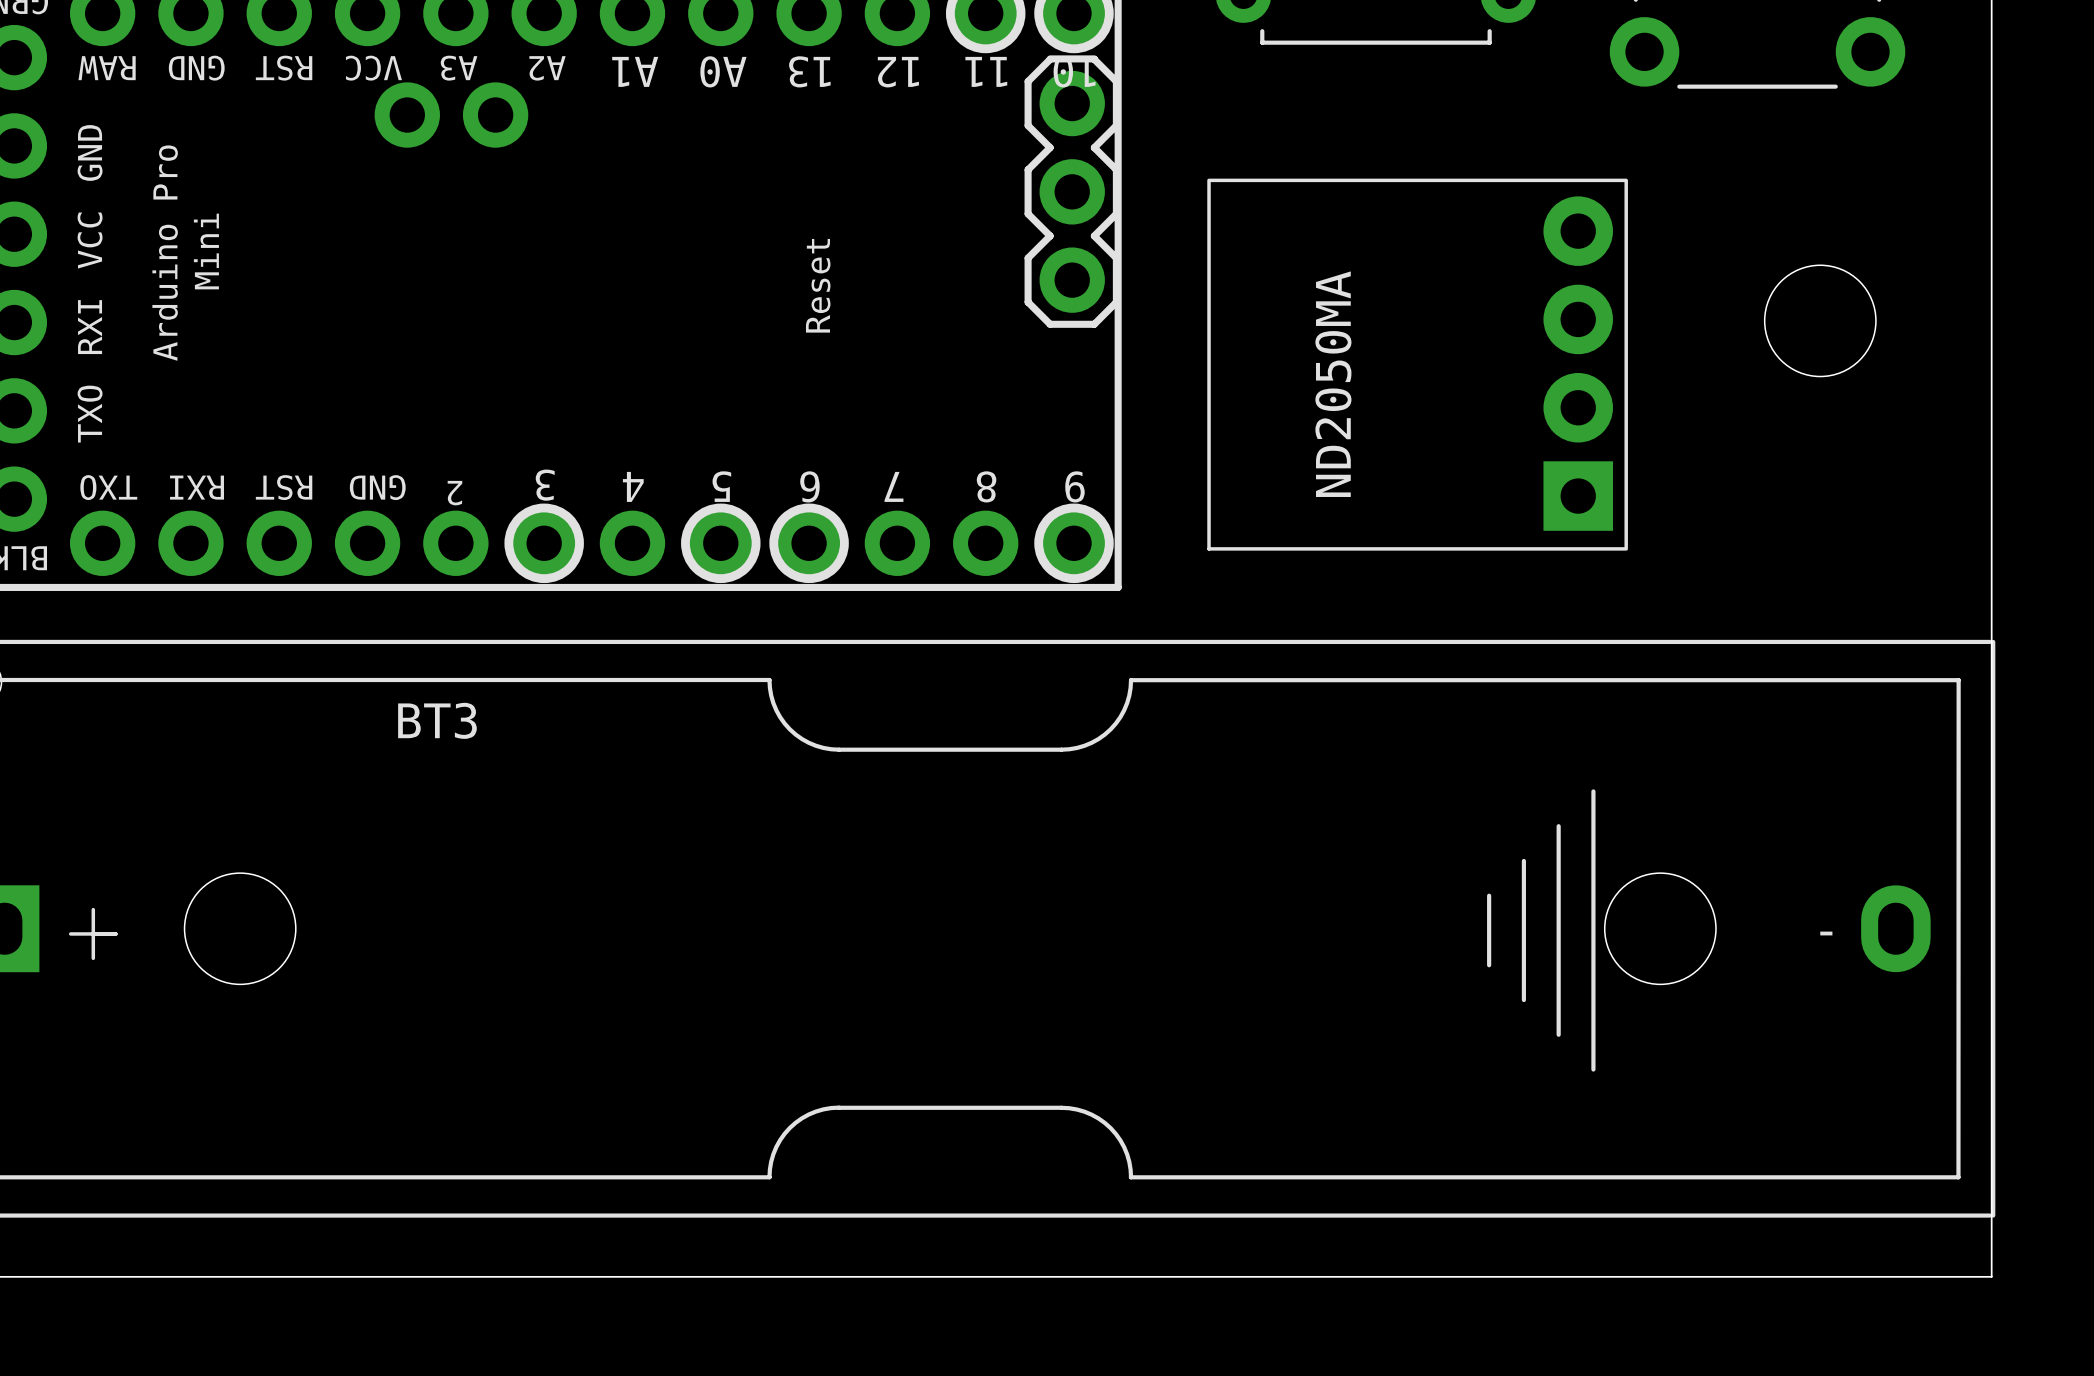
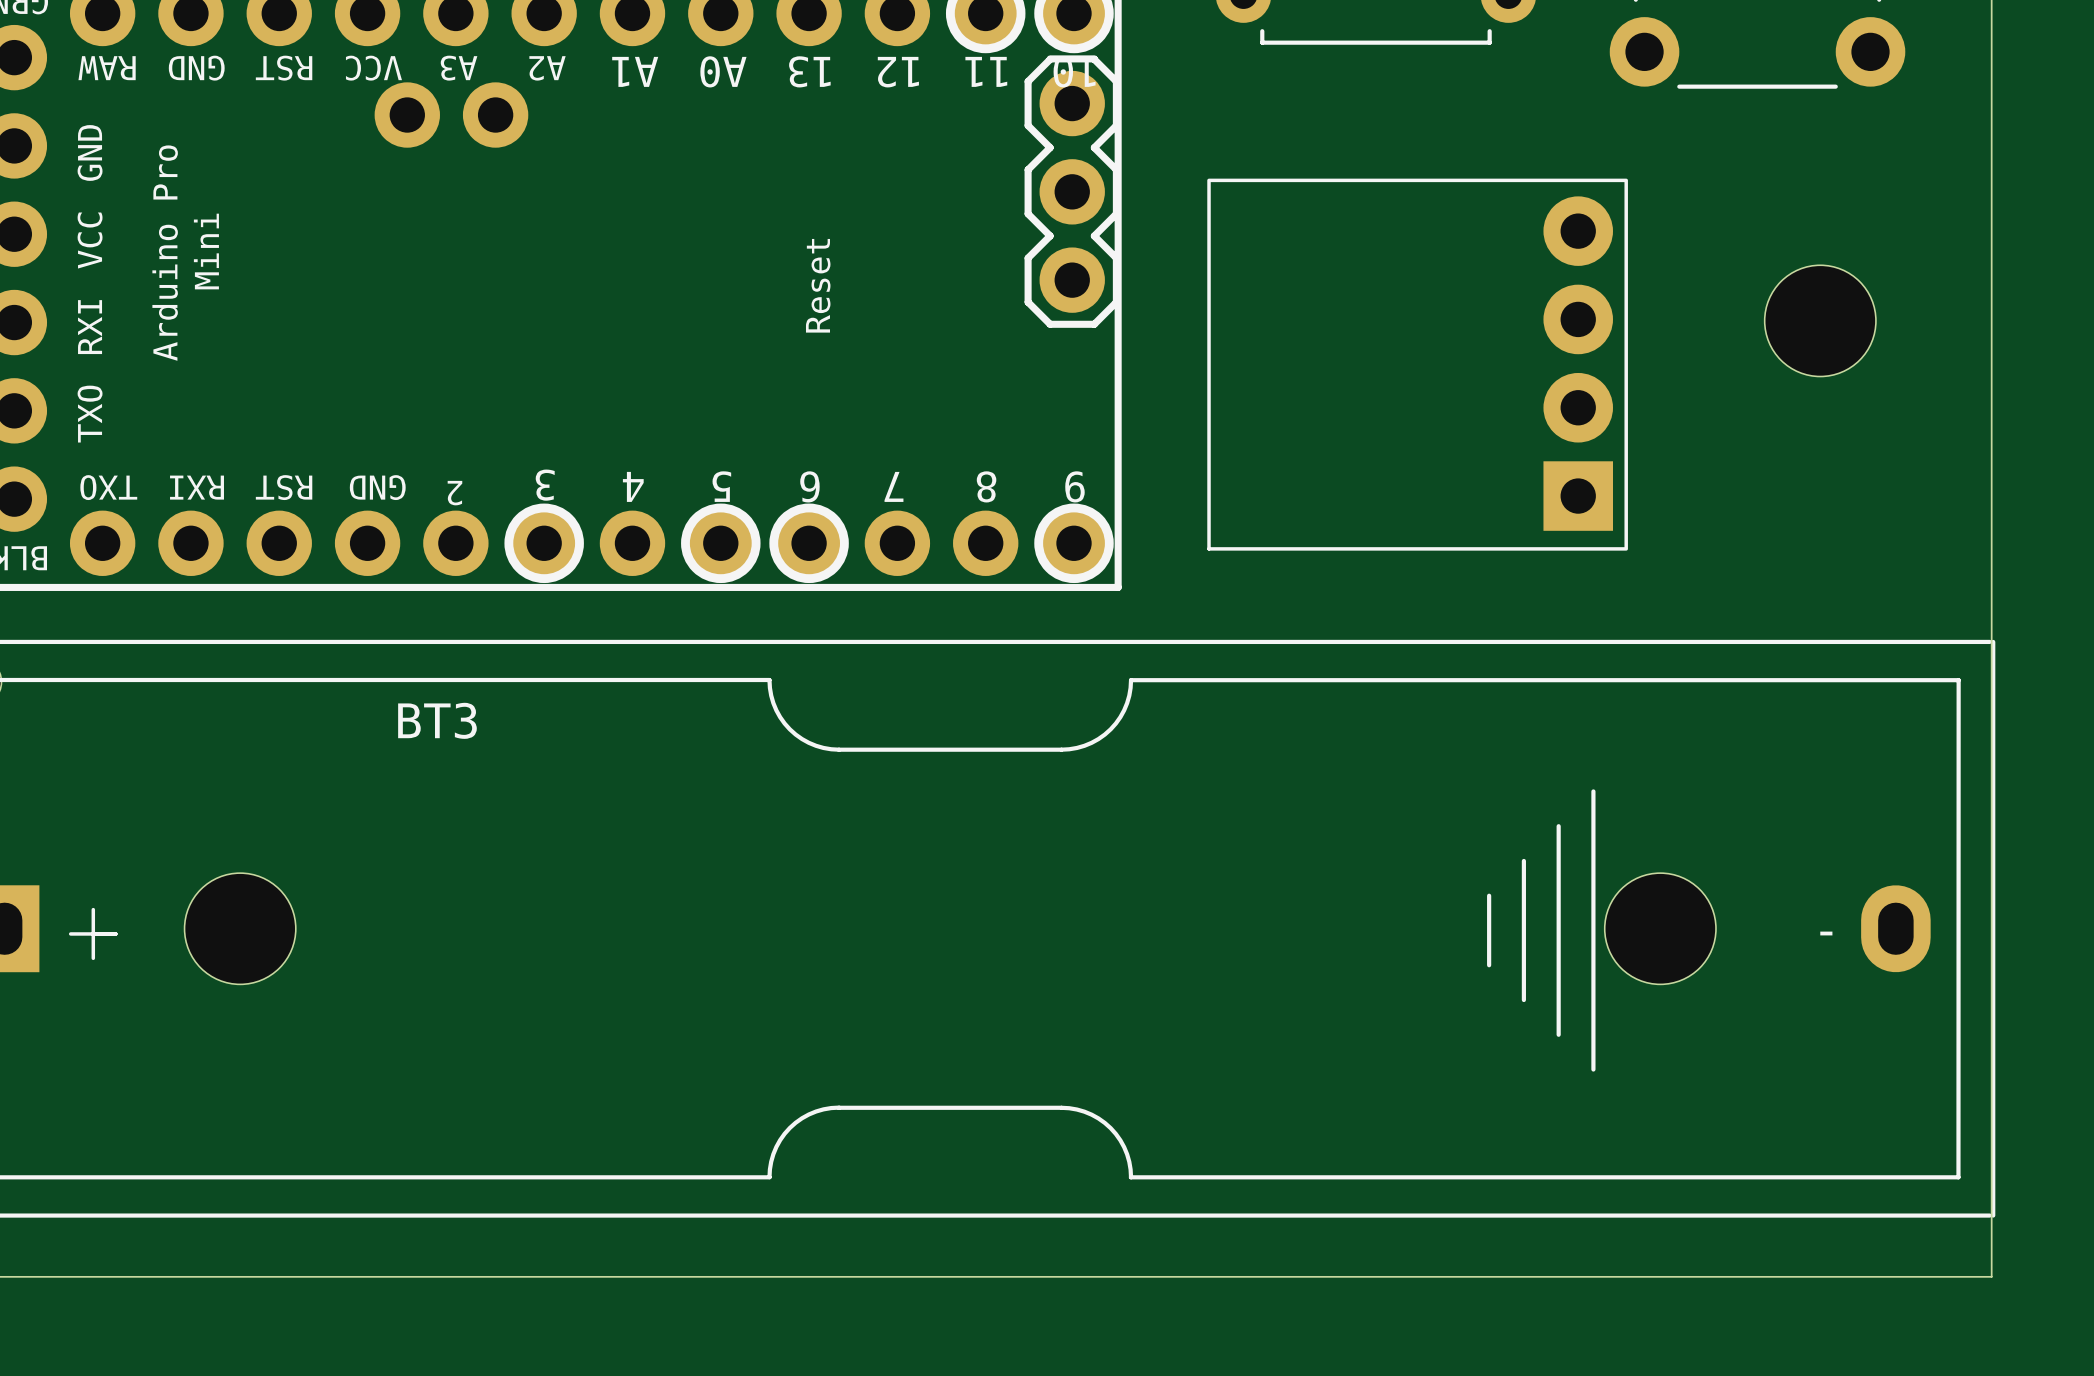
part text: ND2050MA (1333, 384) -> none

